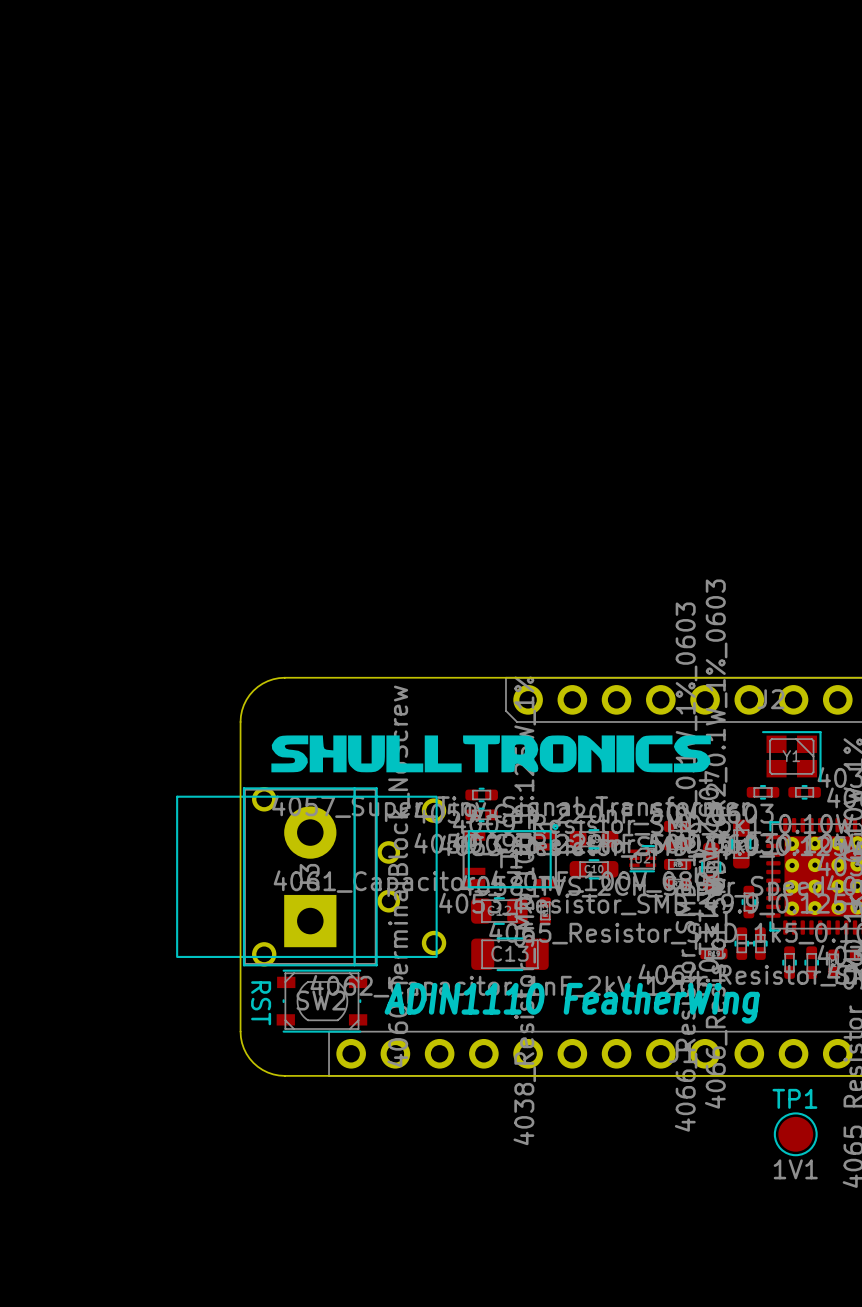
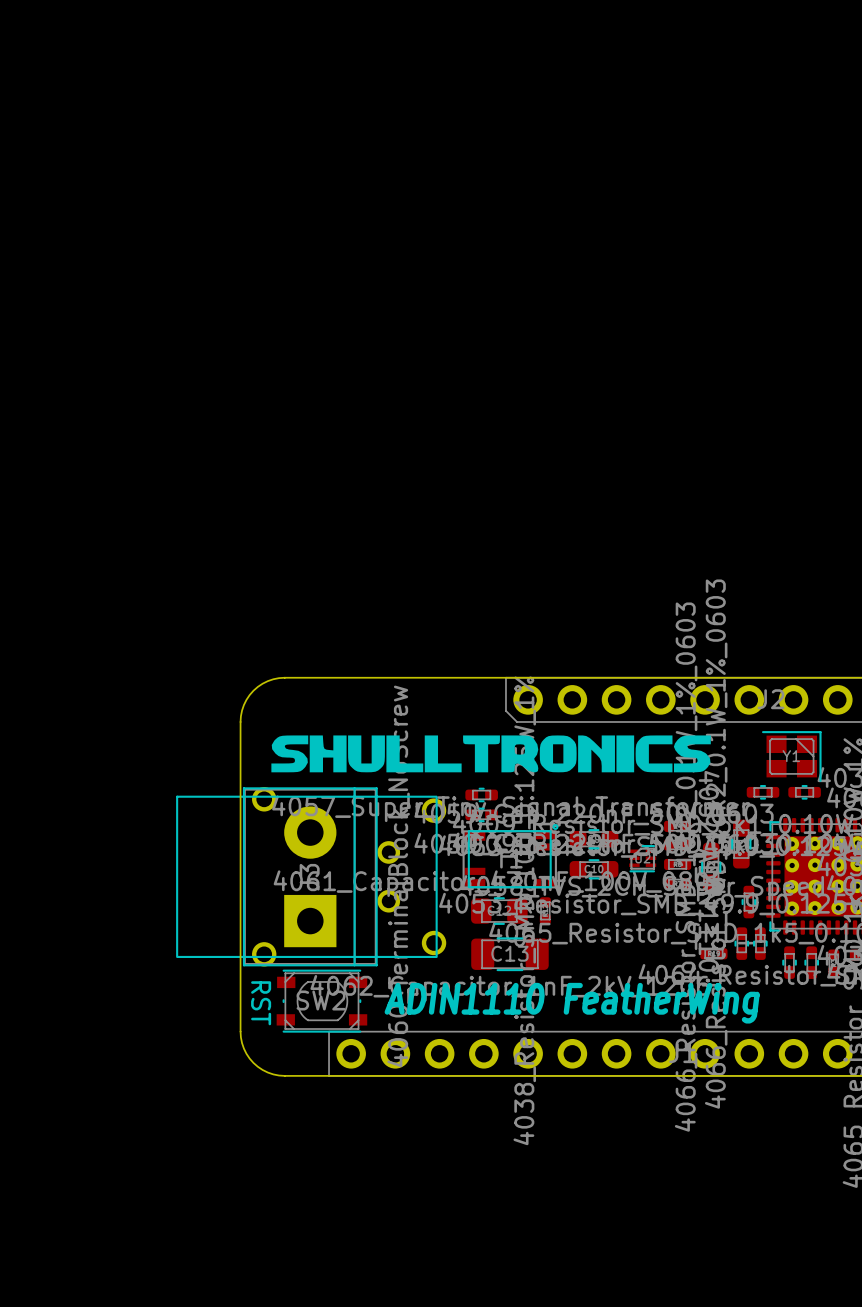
TP1: 1V1 (795, 1134) -> none

